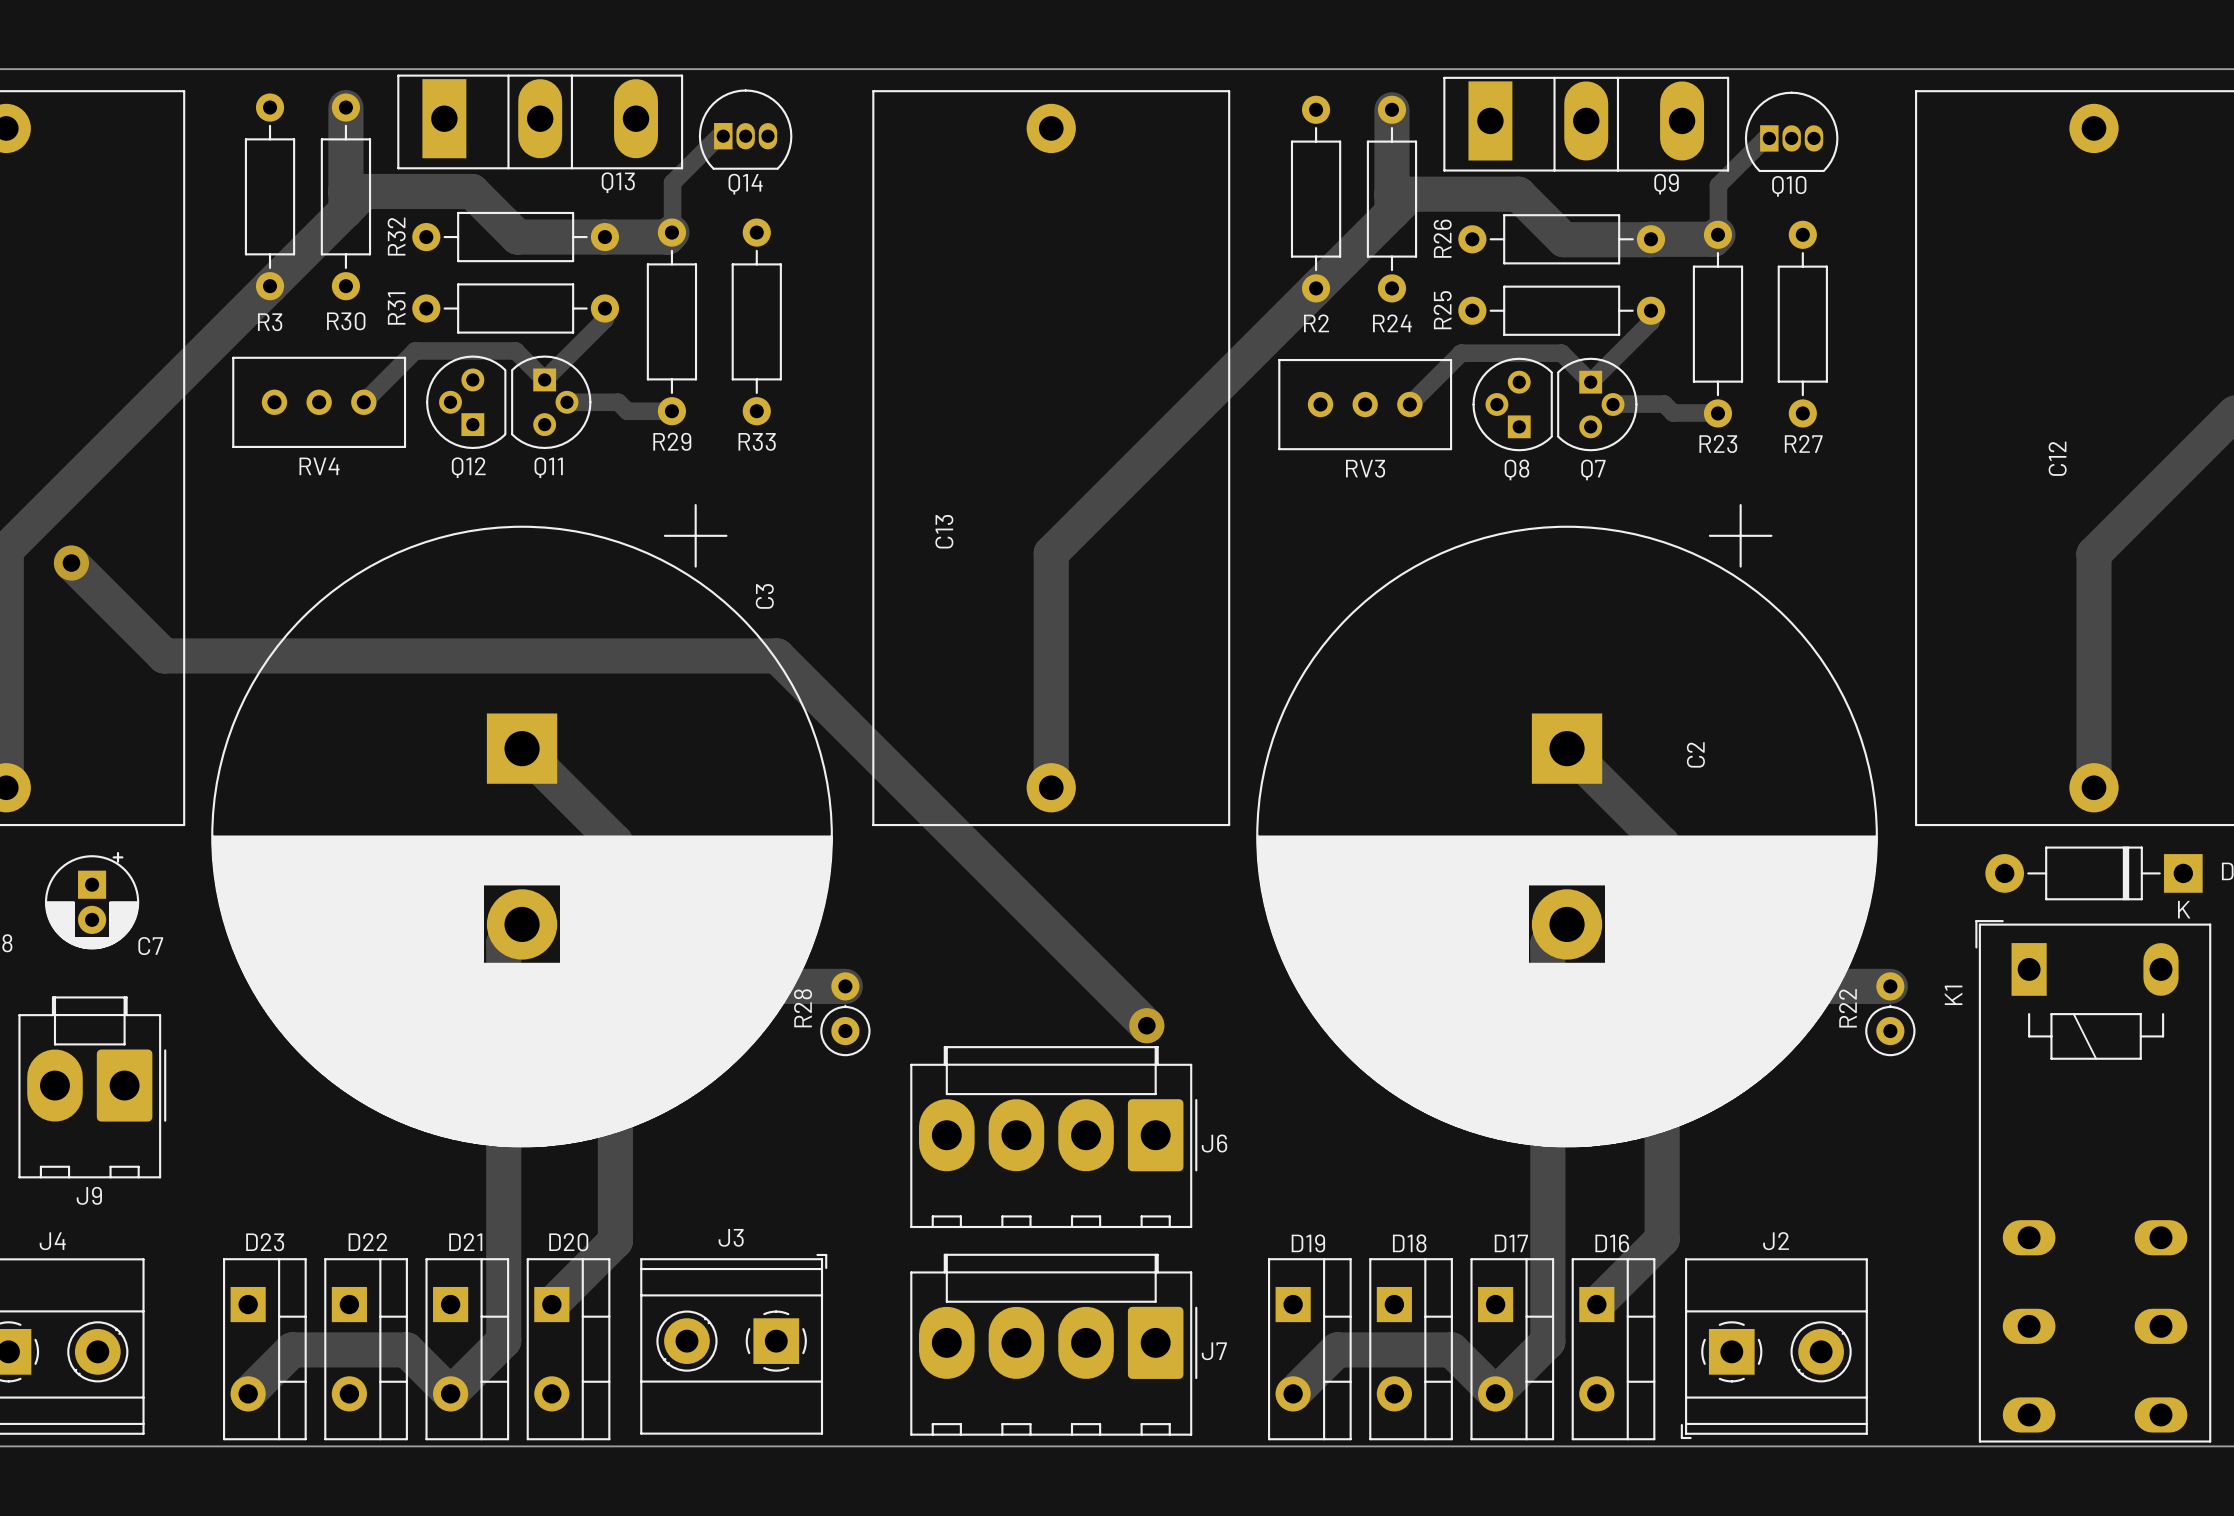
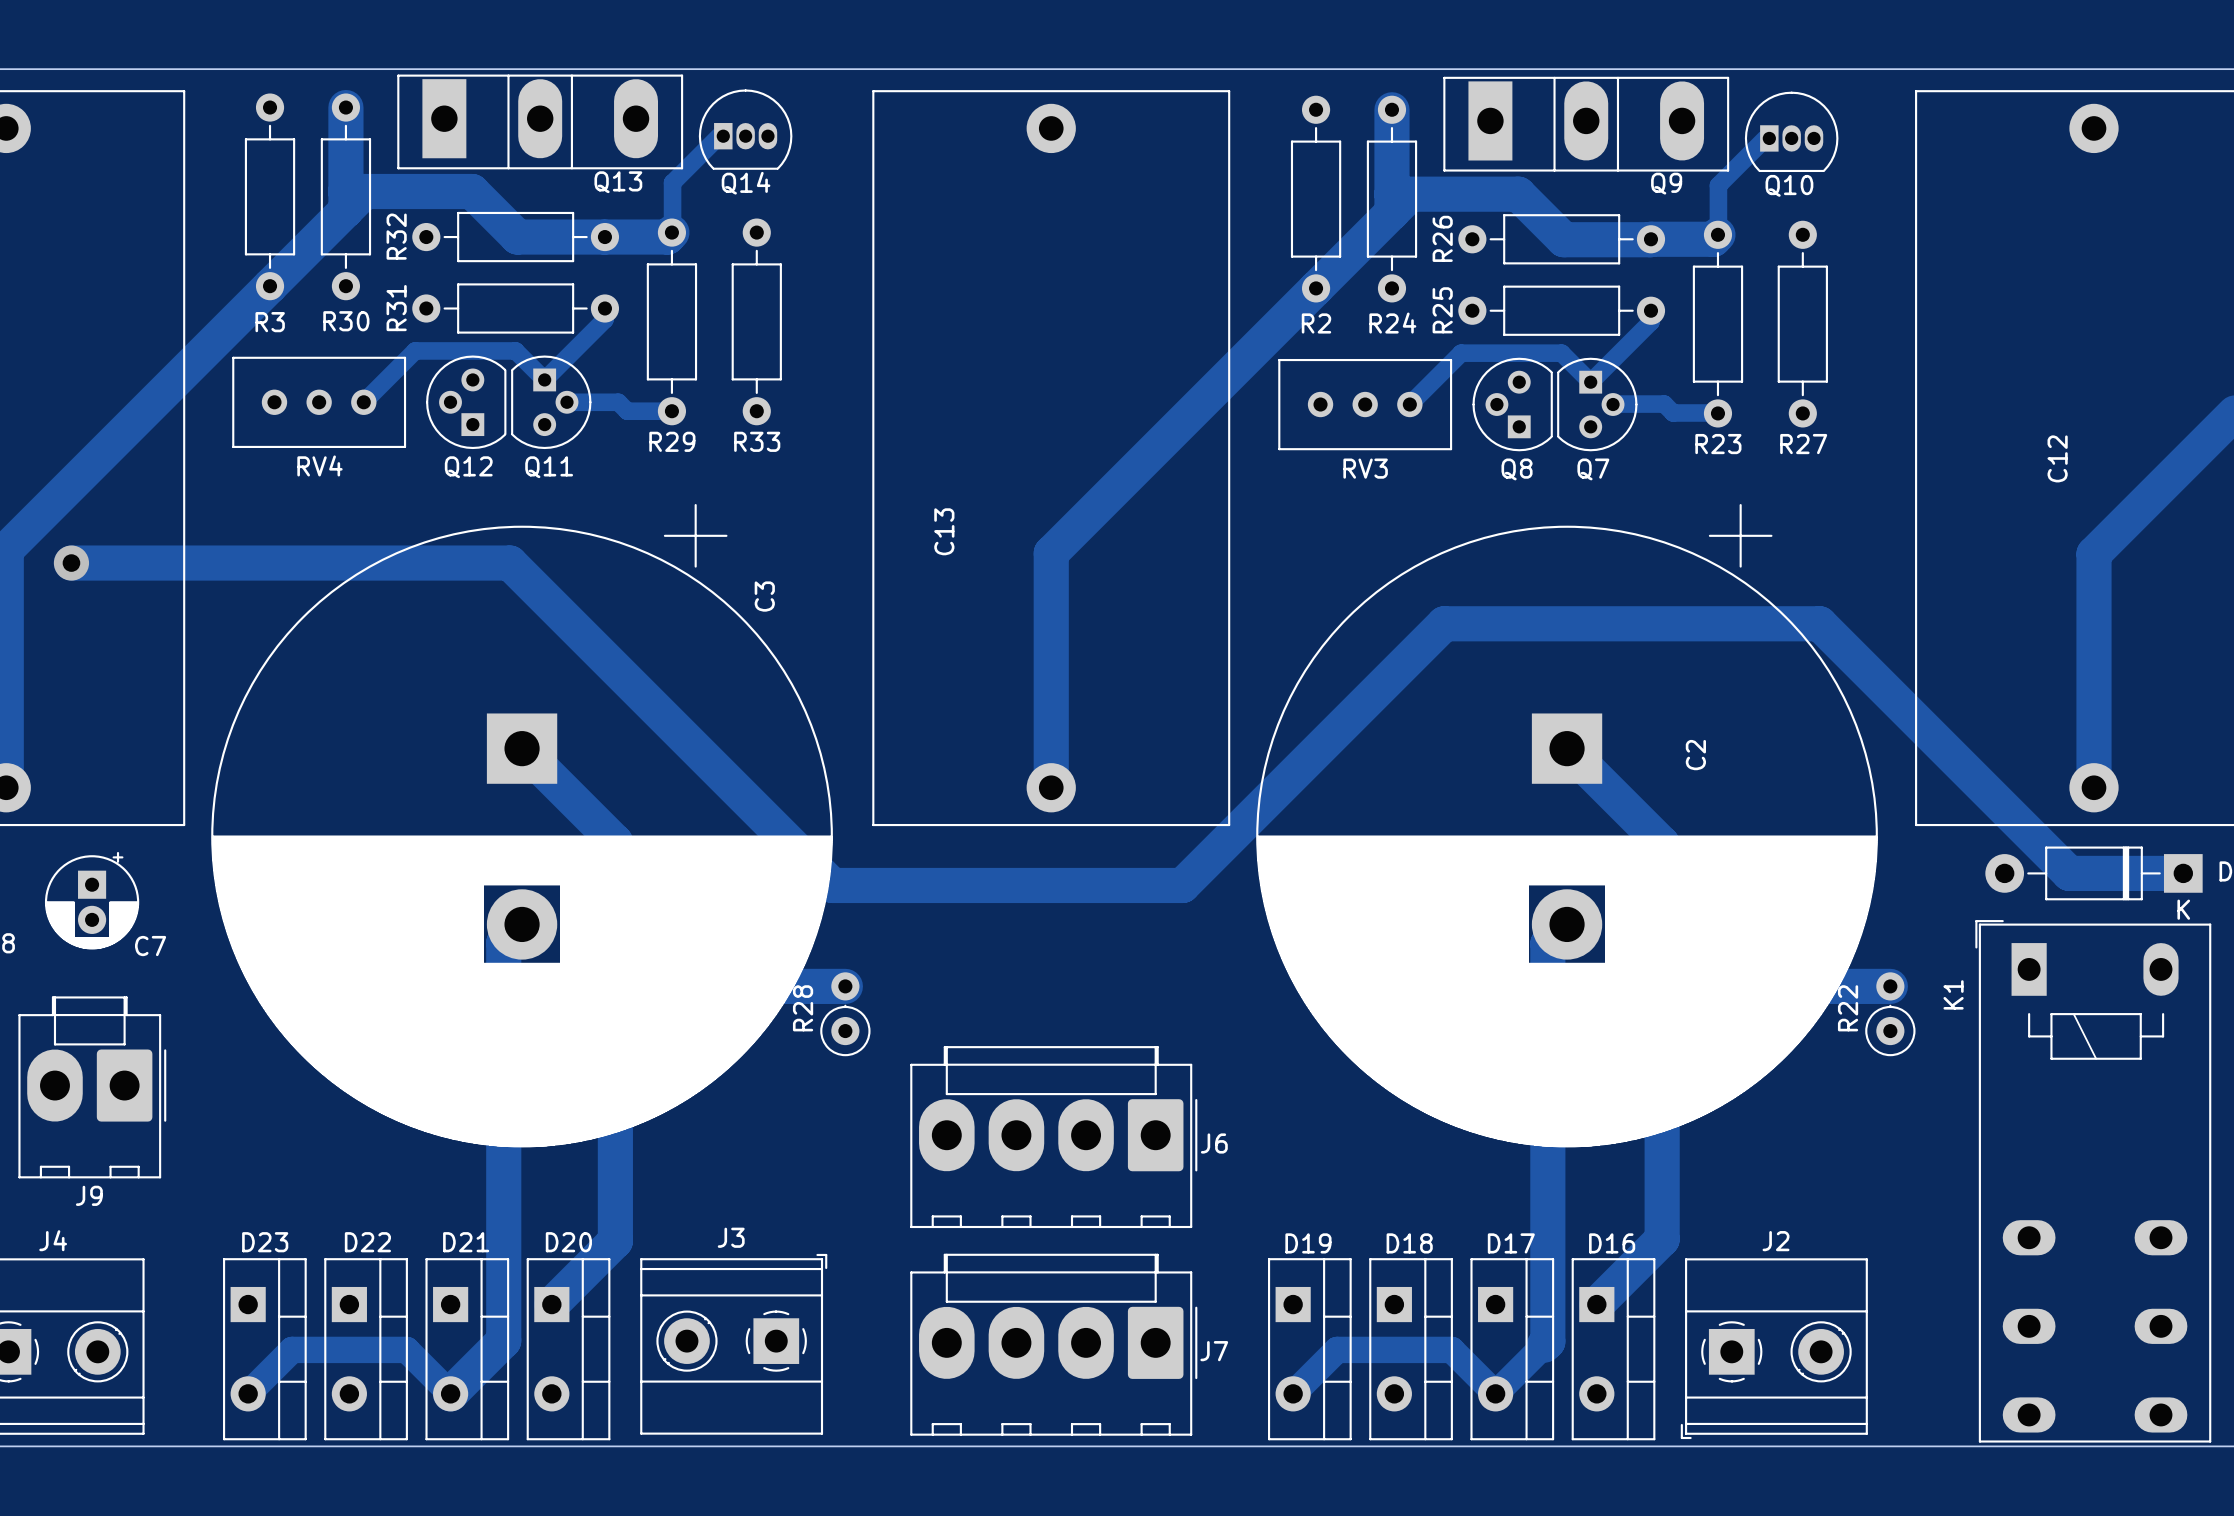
track: (71, 563) (164, 655) (777, 655) (1146, 1025) -> (71, 563) (510, 563) (832, 885) (1182, 885) (1444, 623) (1819, 623) (2069, 873) (2183, 873)
via: (1146, 1025) -> none
track width: thick (1544, 1345) (1495, 1393) (1451, 1349) (1337, 1349) (1293, 1393) -> thin (1544, 1345) (1495, 1393) (1451, 1349) (1337, 1349) (1293, 1393)
track width: thick (248, 1393) (292, 1349) (406, 1349) (450, 1393) -> thin (248, 1393) (292, 1349) (406, 1349) (450, 1393)

